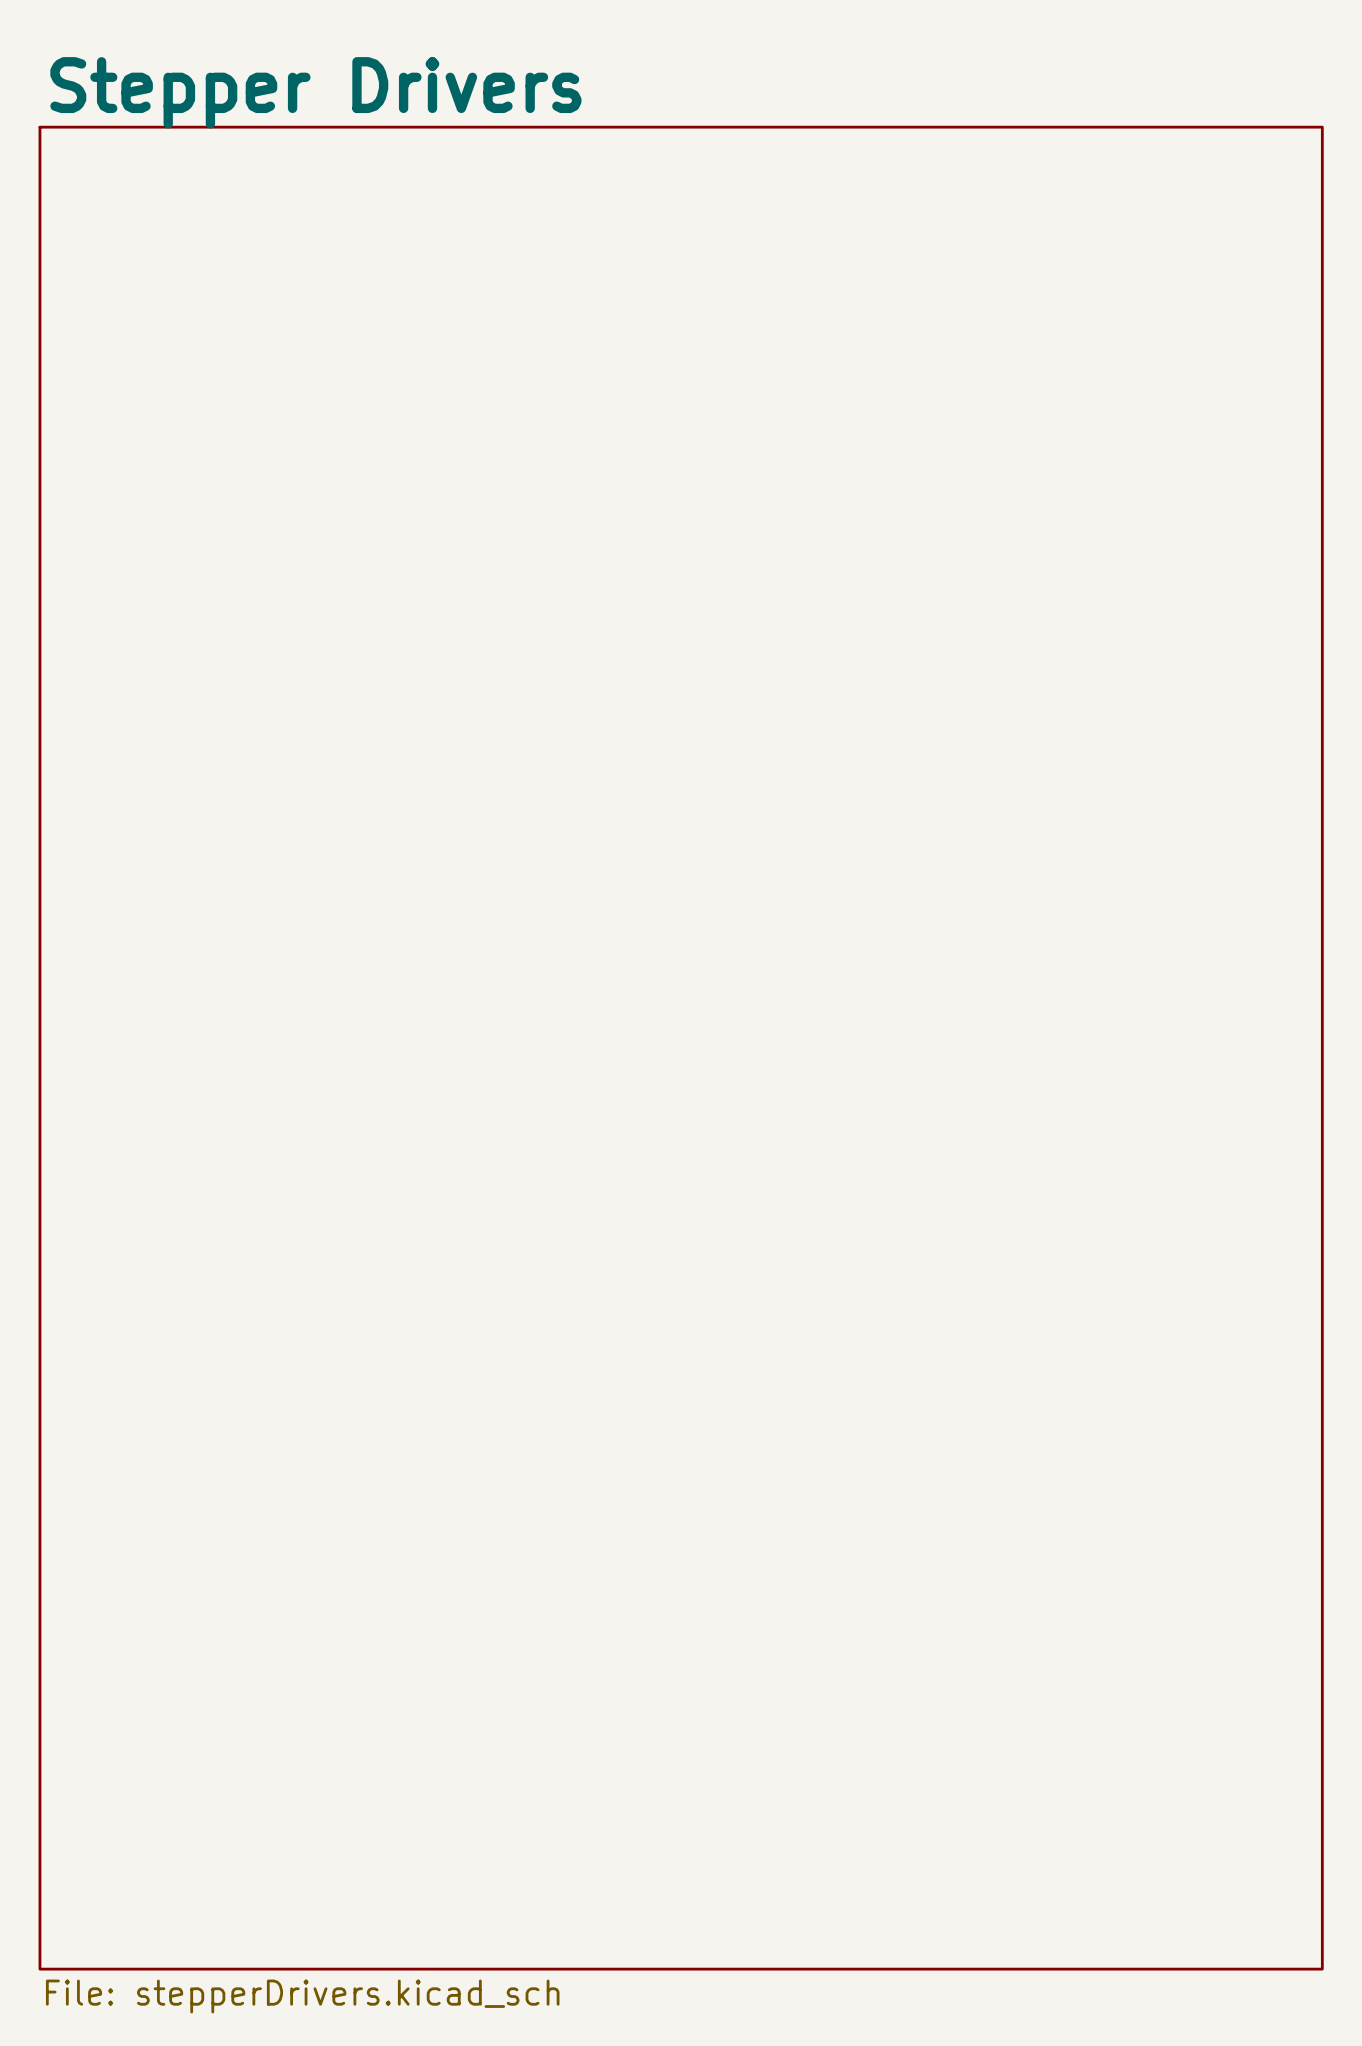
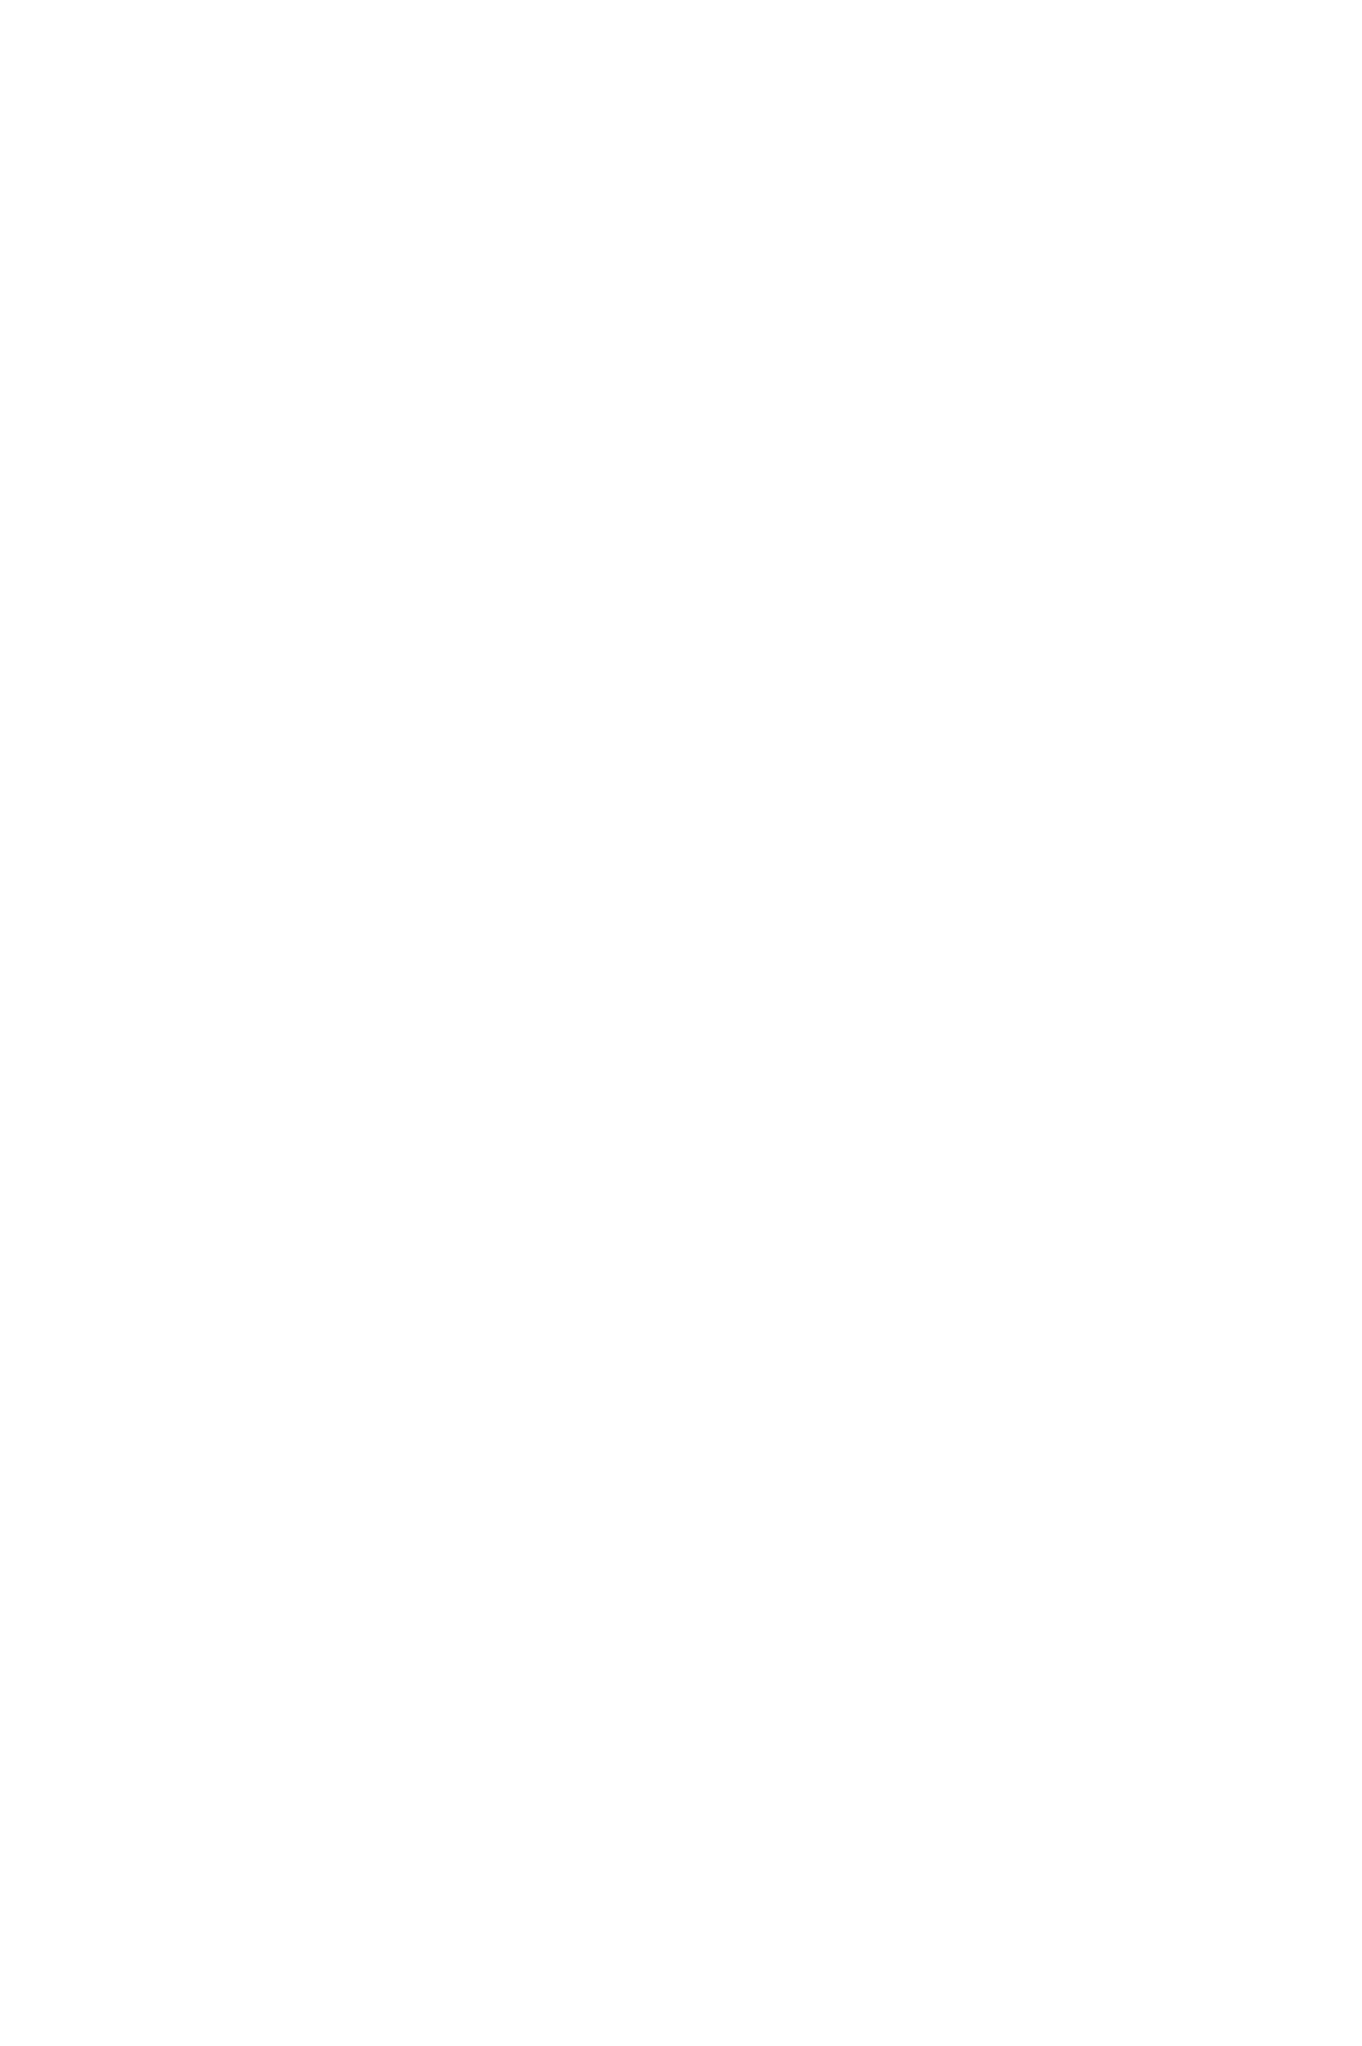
sheet Stepper Drivers: File: stepperDrivers.kicad_sch (681, 1048) -> none

